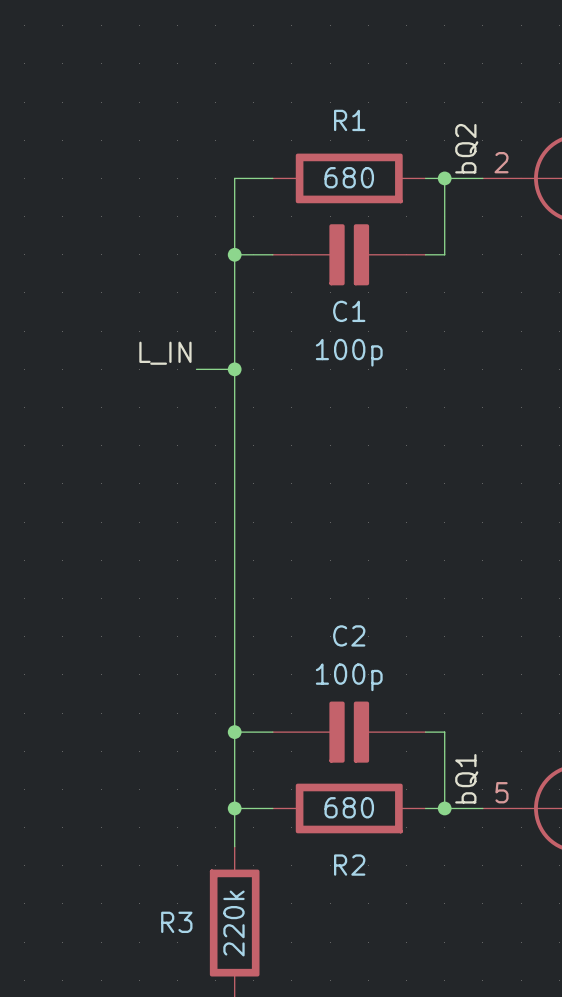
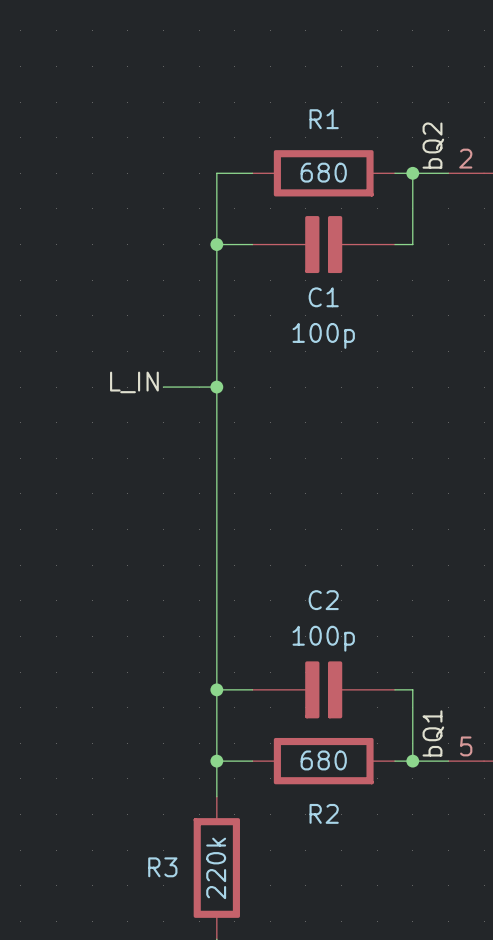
label position: L_IN (165, 353) -> L_IN (134, 382)
wire: (196, 369) (234, 369) -> none
junction position: (234, 369) -> (216, 387)
wire: none -> (163, 387) (216, 387)

